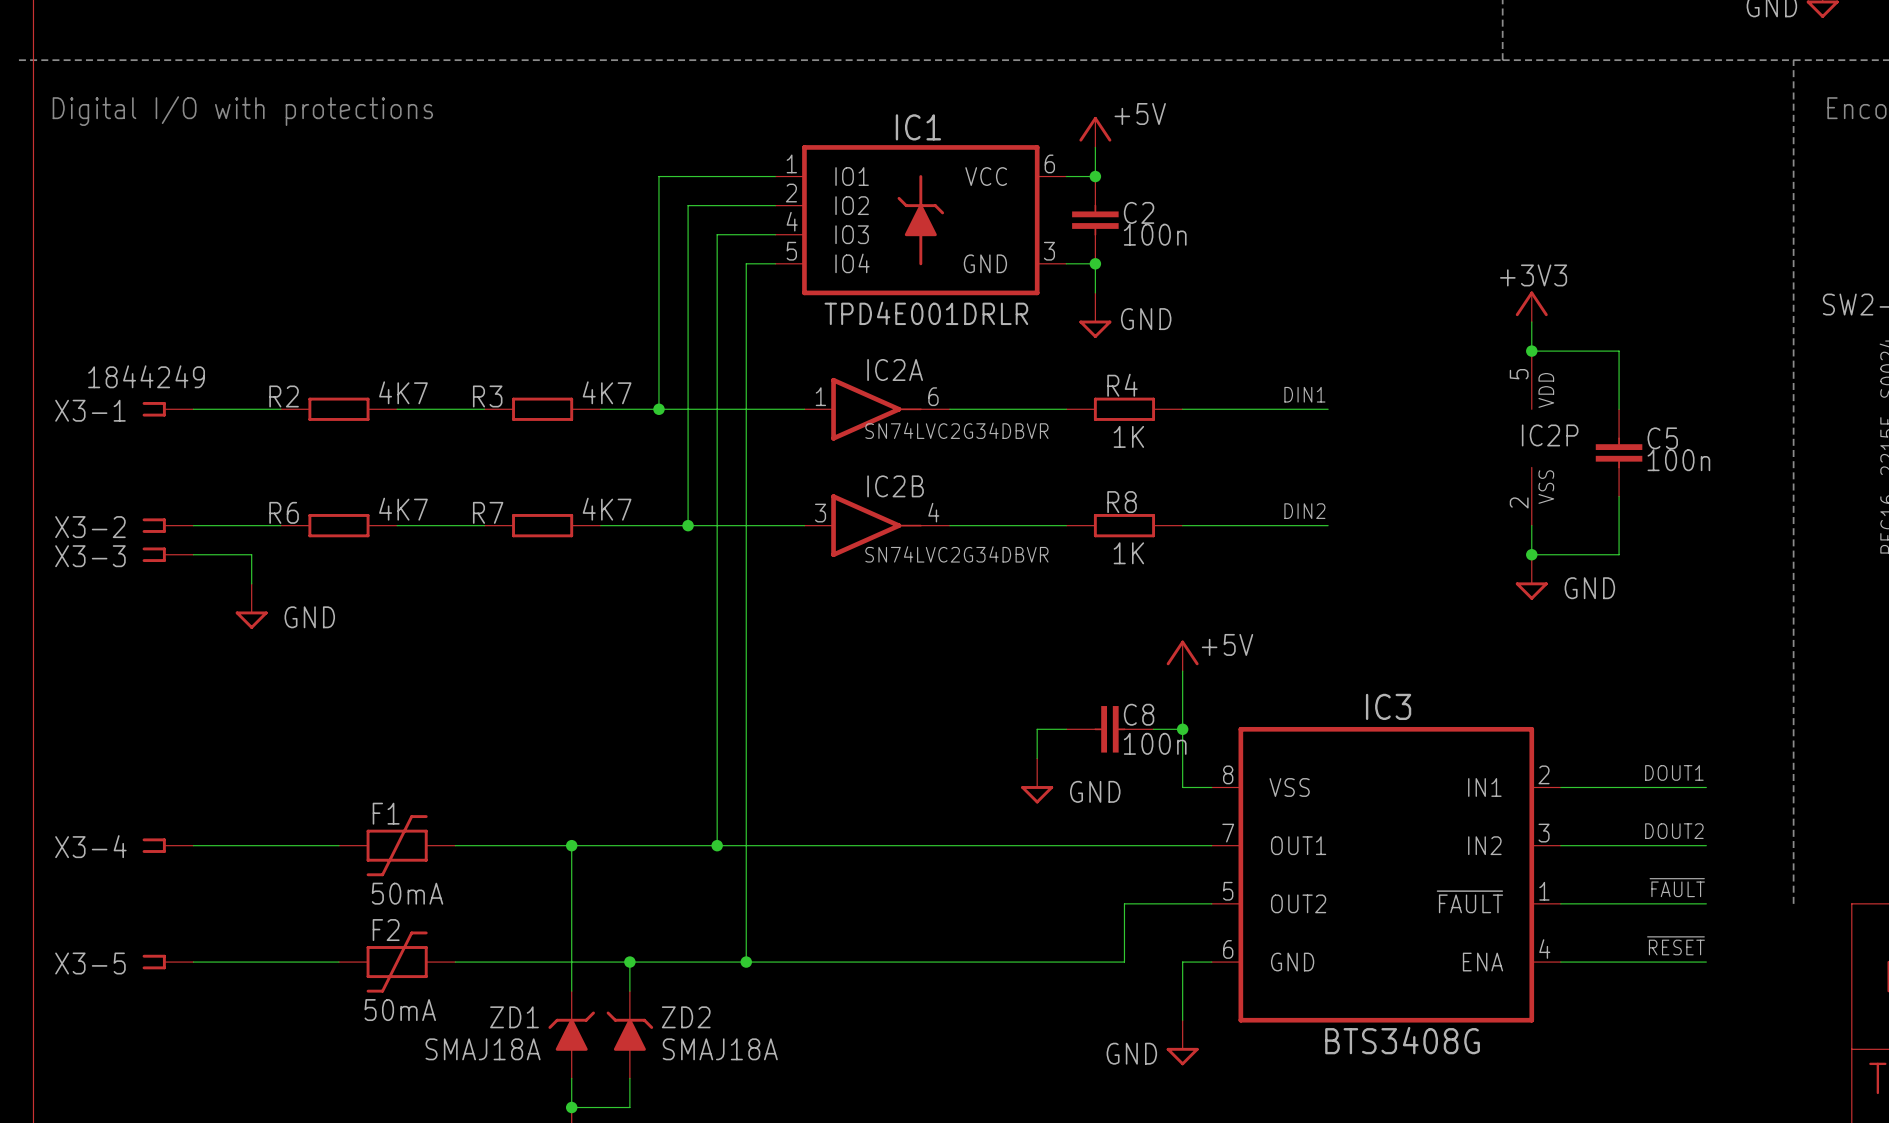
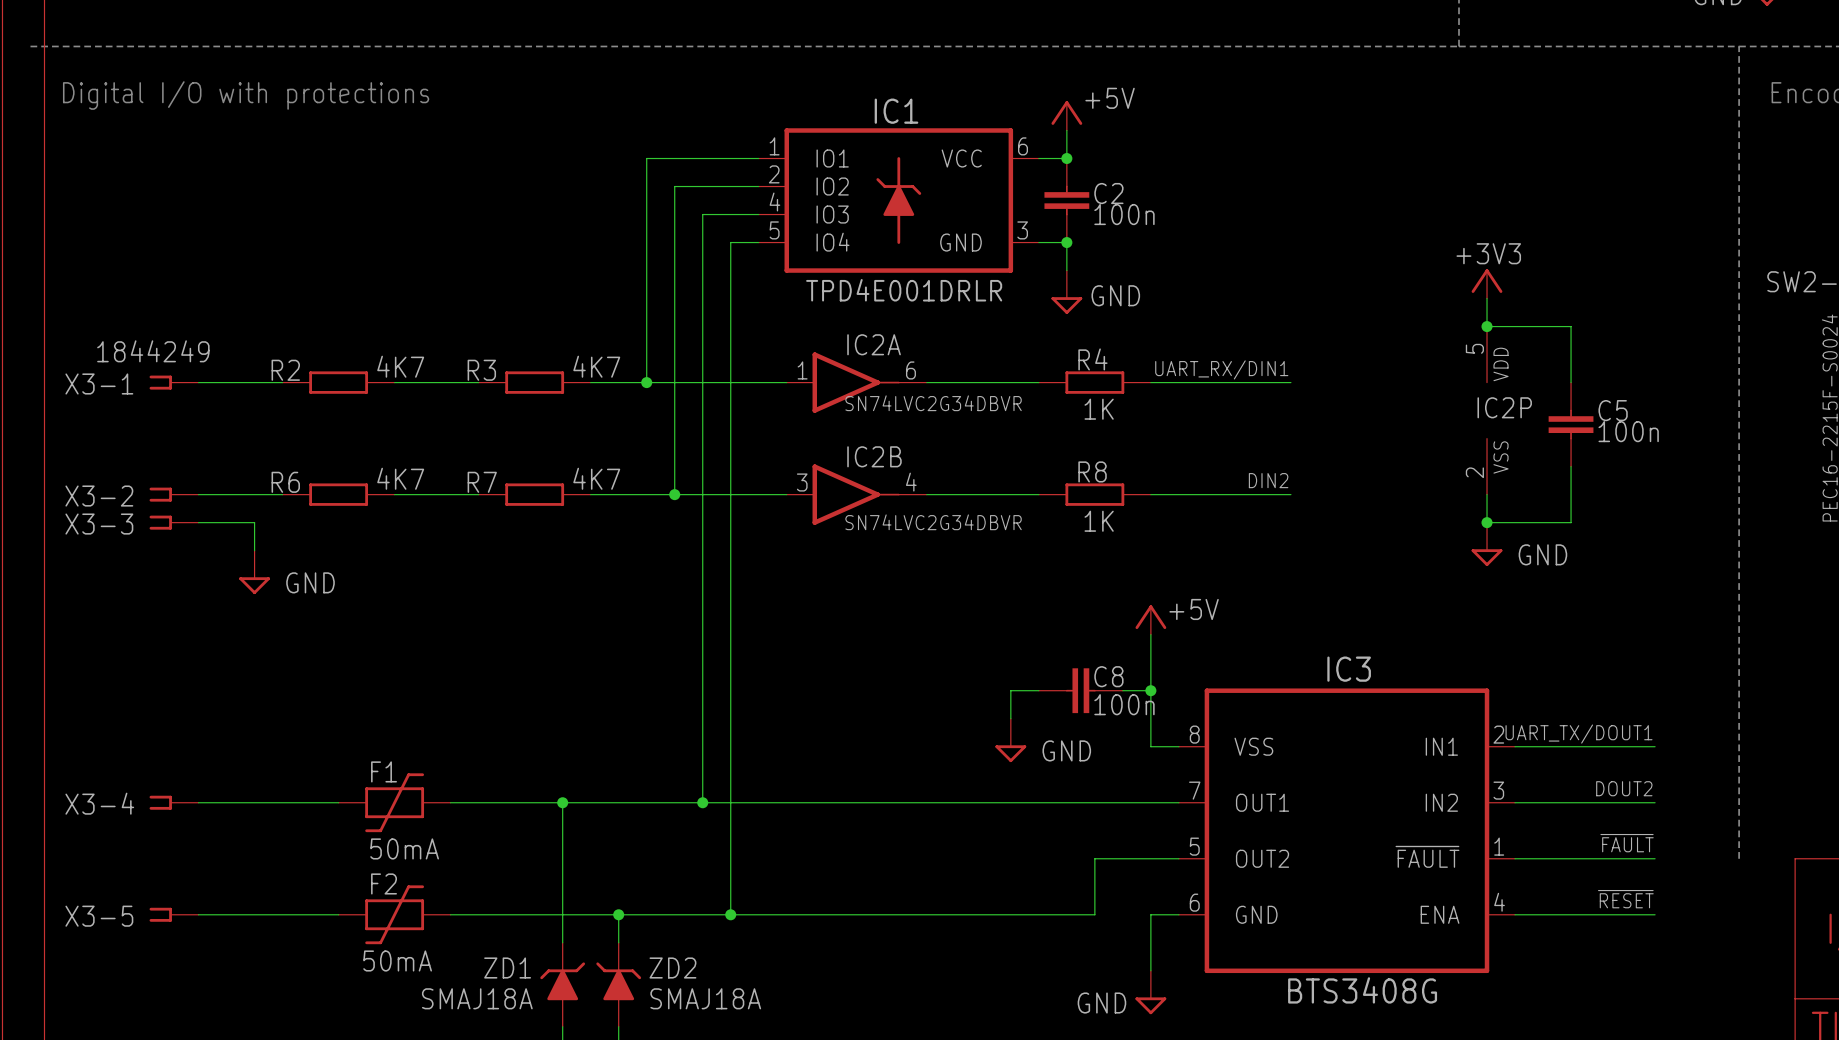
label: DIN1 (1304, 394) -> UART_RX/DIN1 (1221, 369)
label: DOUT1 (1674, 772) -> UART_TX/DOUT1 (1579, 734)

